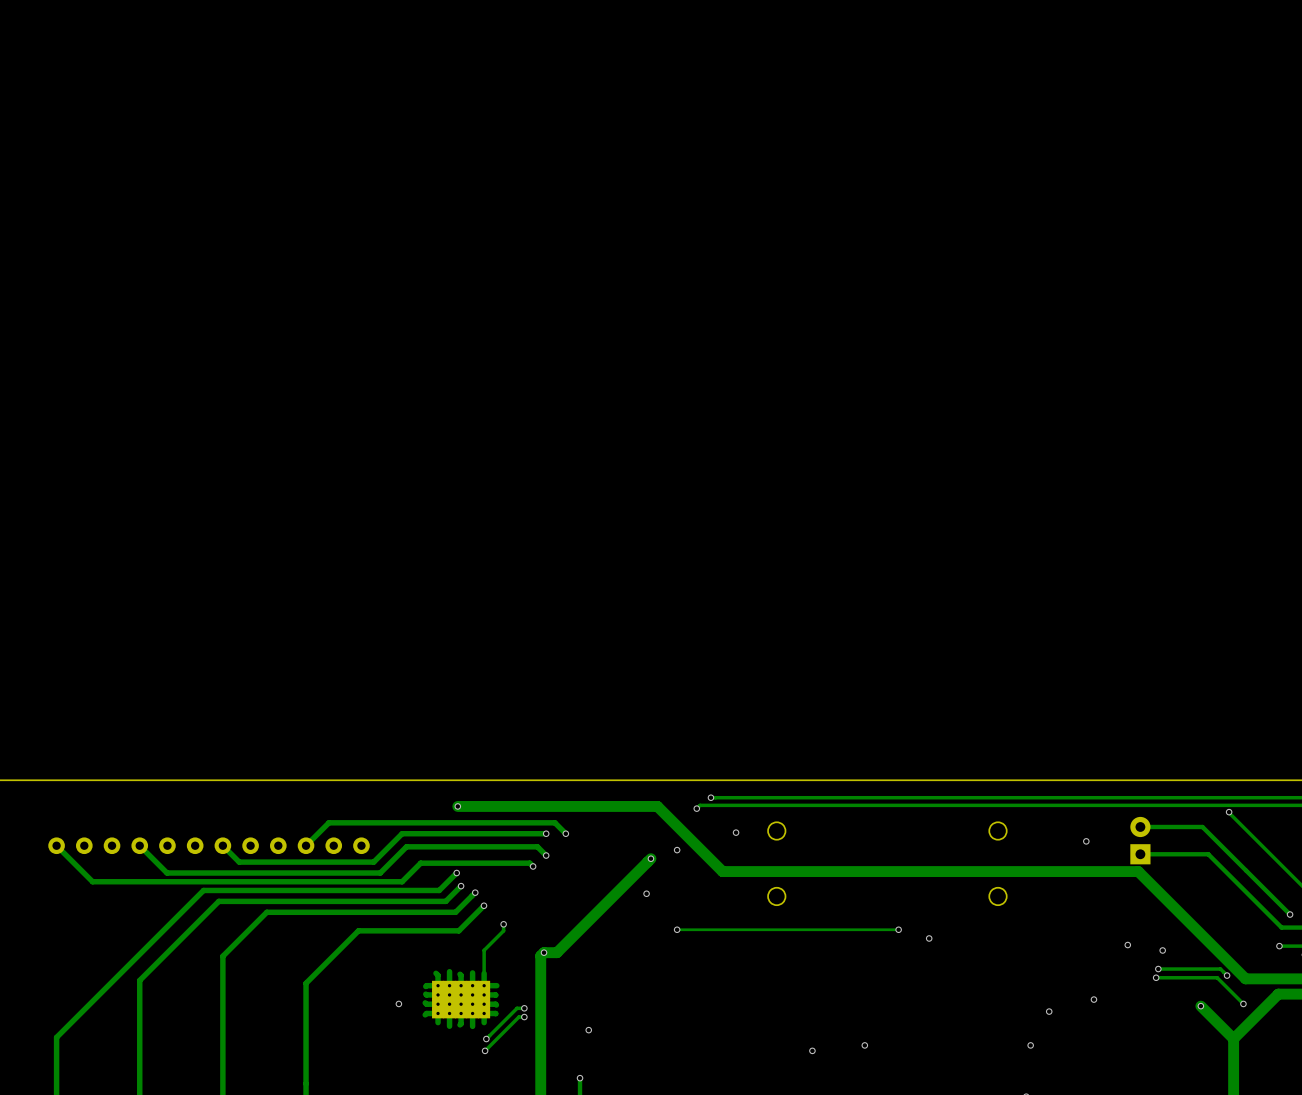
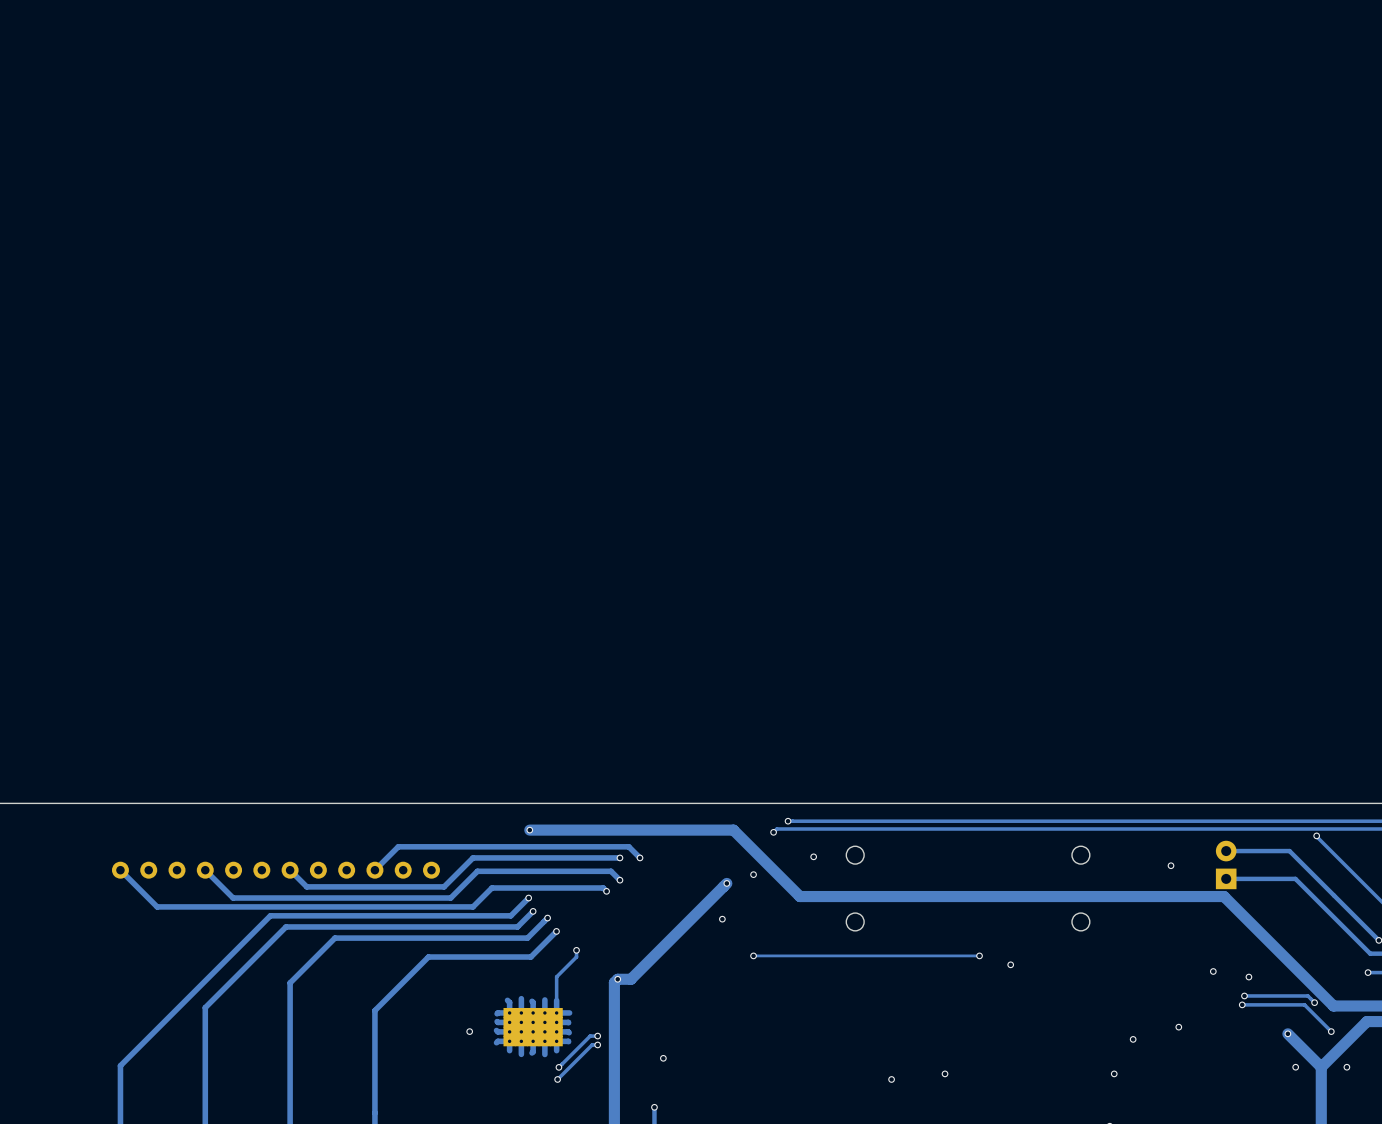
via: none -> (1295, 1067)
via: none -> (1346, 1067)

